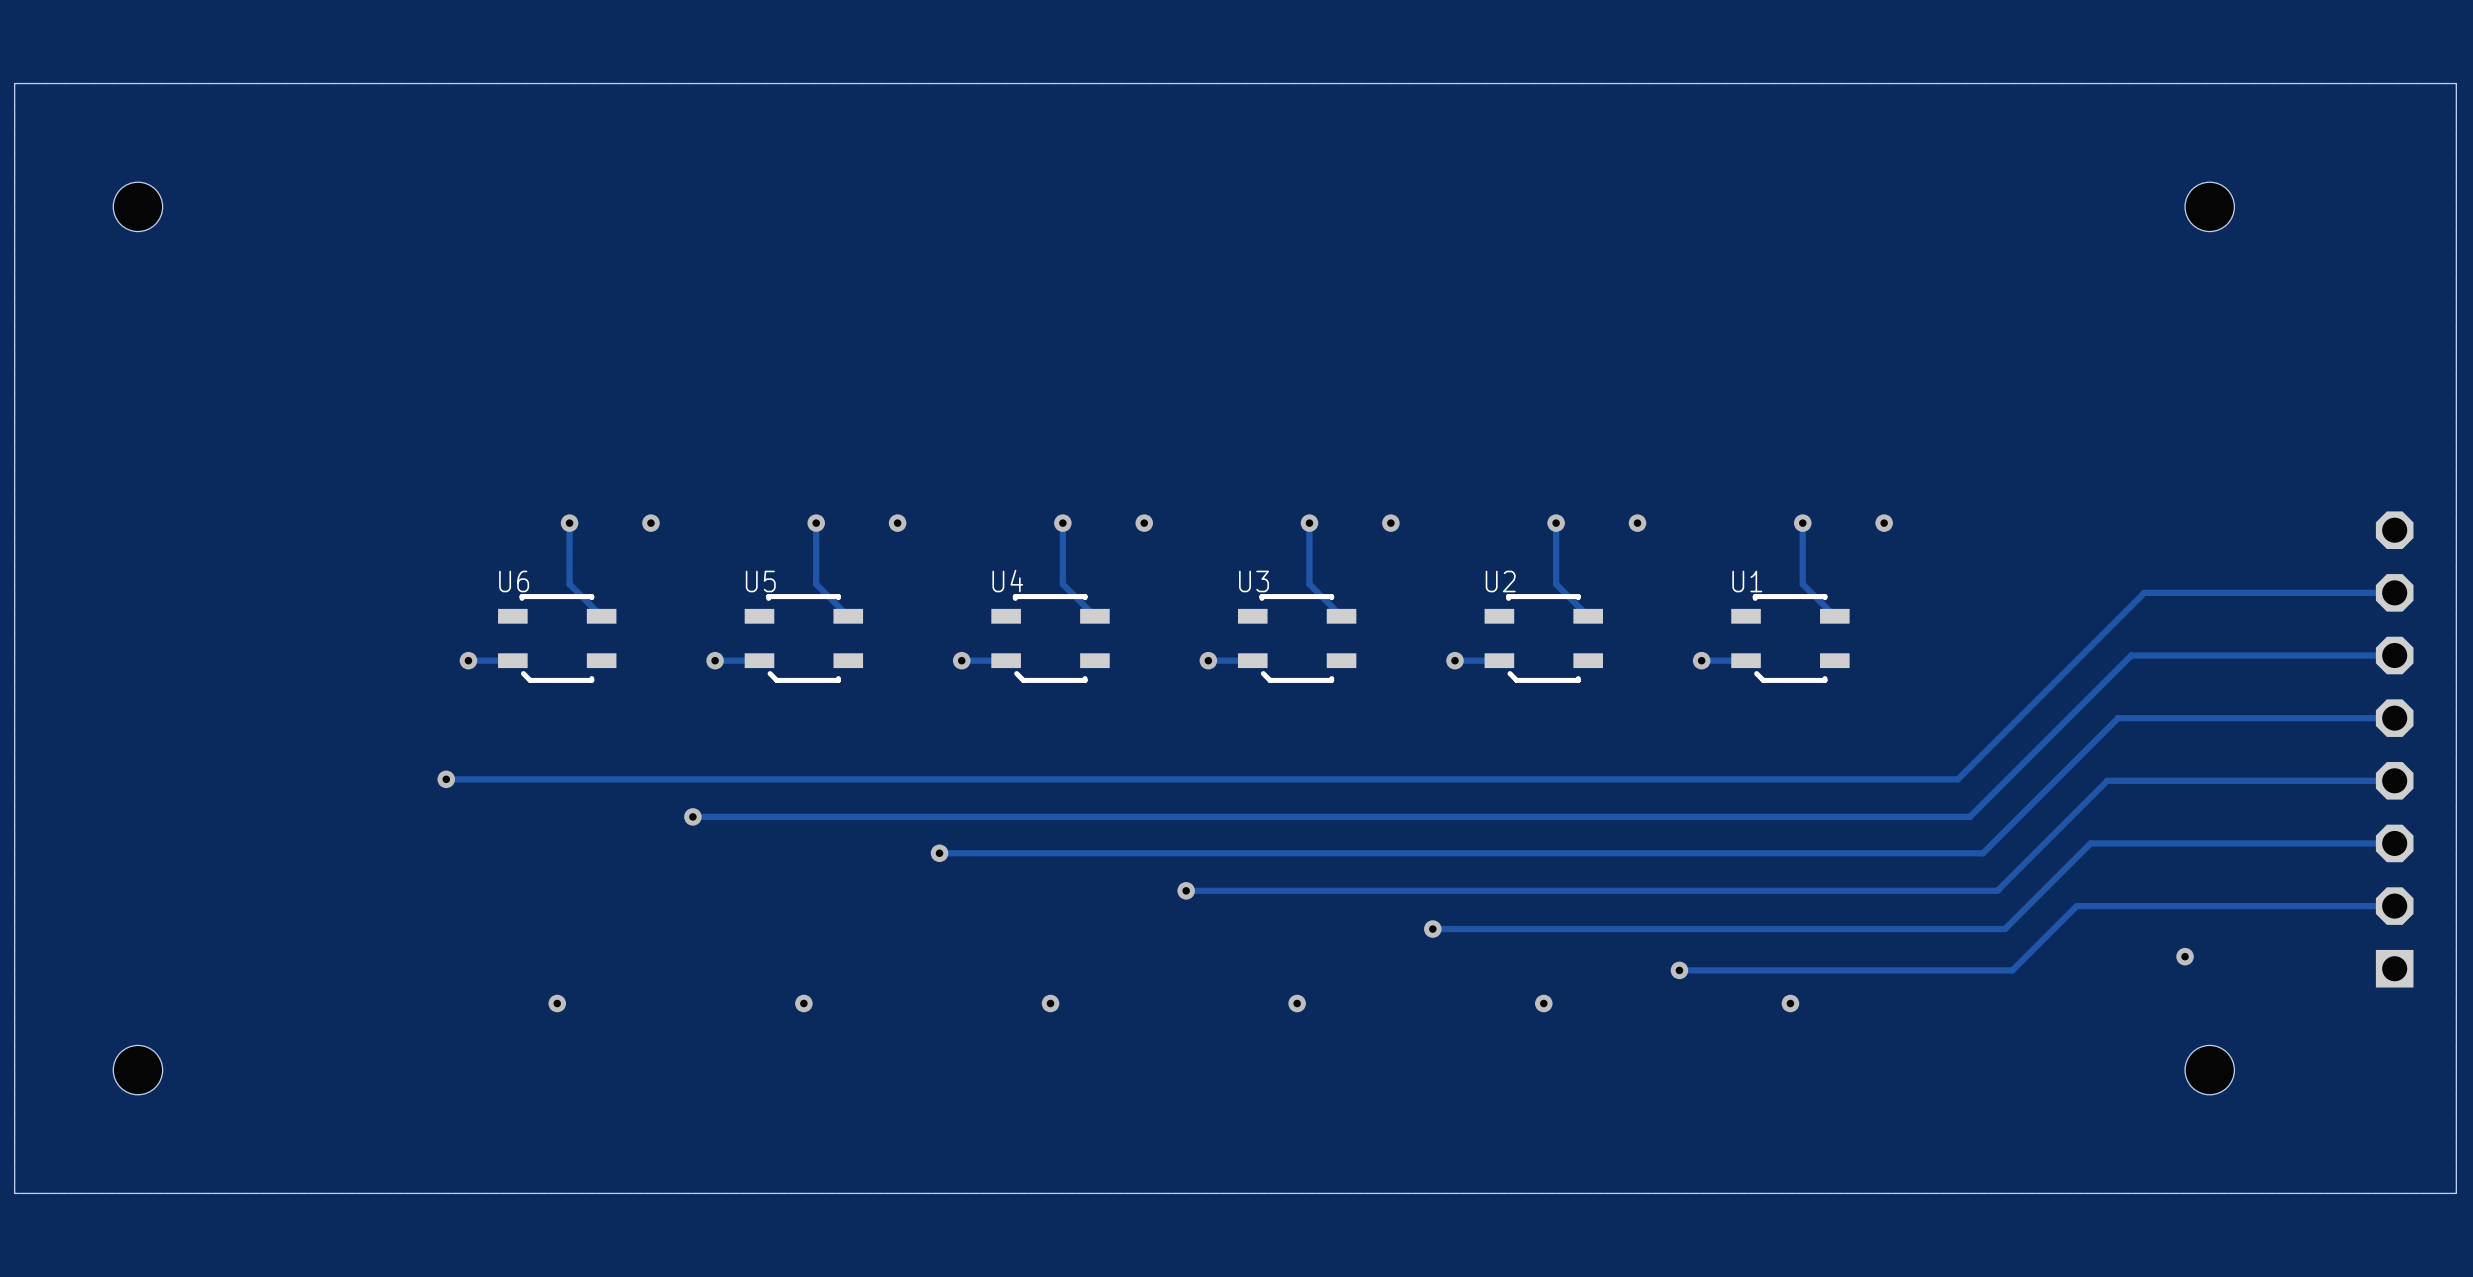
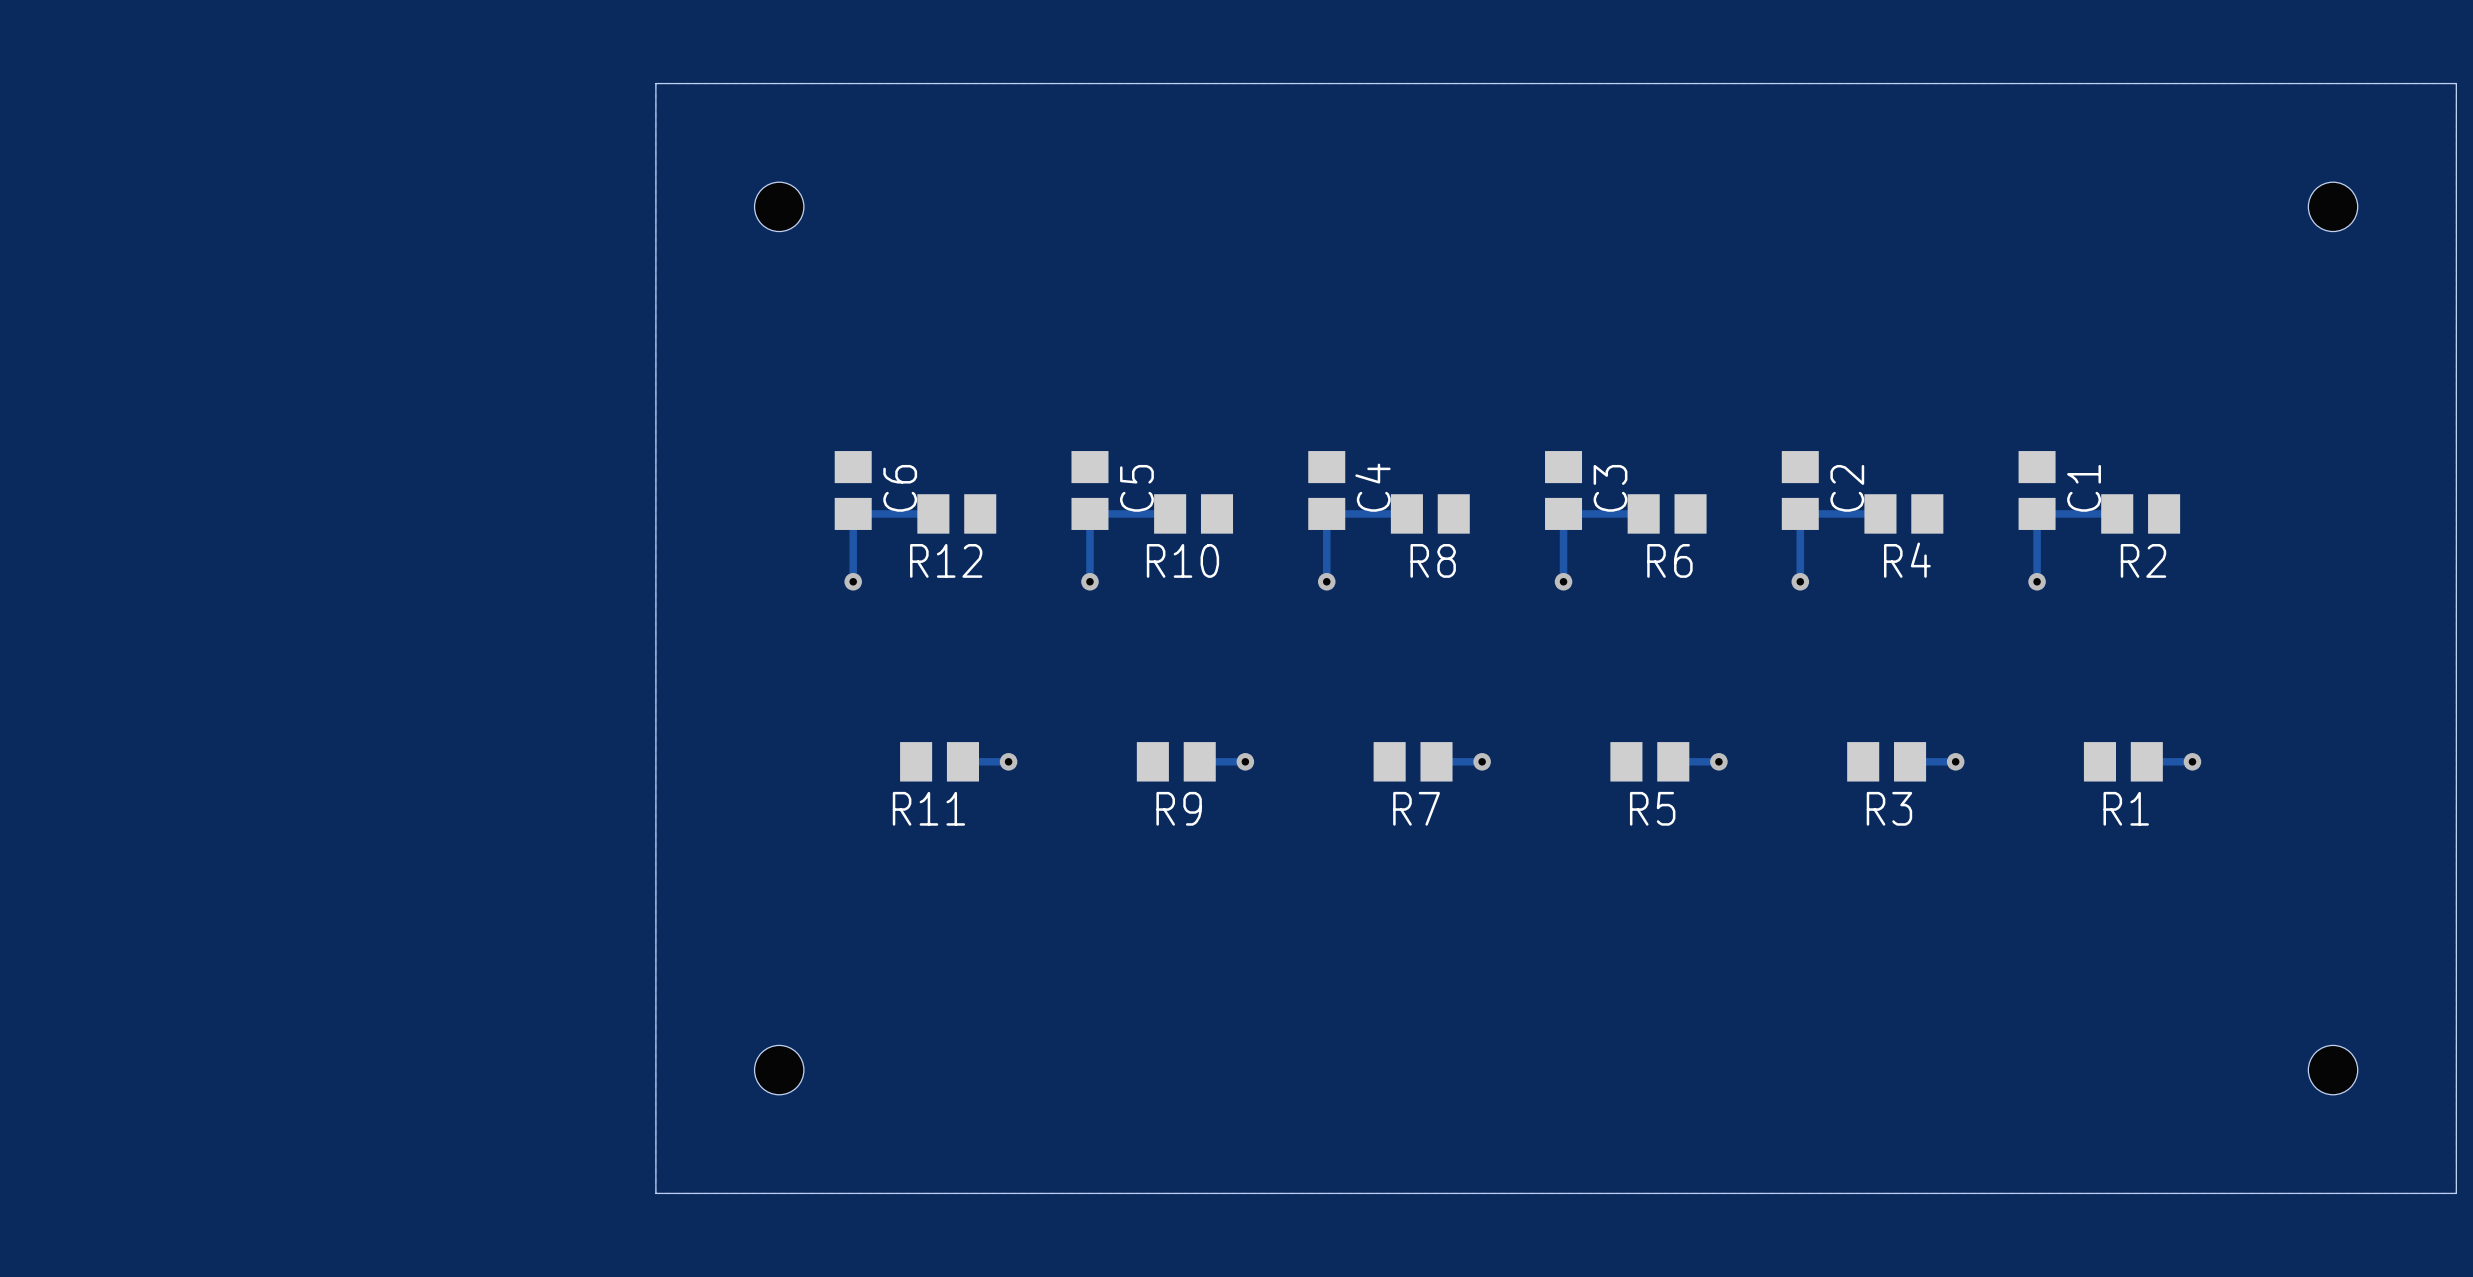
board edge: (655, 83) (14, 83) (14, 1193) (655, 1193) -> (655, 83) (655, 1193)
hole: (137, 206) -> none
hole: none -> (779, 206)
hole position: (2209, 206) -> (2333, 206)
C6: none -> (853, 490)
C5: none -> (1089, 490)
C4: none -> (1326, 490)
C3: none -> (1563, 490)
C2: none -> (1800, 490)
C1: none -> (2037, 490)
track: none -> (933, 513) (853, 513) (853, 581)
R12: none -> (956, 513)
track: none -> (1170, 513) (1089, 513) (1089, 581)
R10: none -> (1193, 513)
track: none -> (1406, 513) (1326, 513) (1326, 581)
R8: none -> (1430, 513)
track: none -> (1643, 513) (1563, 513) (1563, 581)
R6: none -> (1667, 513)
track: none -> (1880, 513) (1800, 513) (1800, 581)
R4: none -> (1903, 513)
track: none -> (2117, 513) (2037, 513) (2037, 581)
R2: none -> (2140, 513)
track: (569, 523) (569, 584) (601, 616) -> none
via: (569, 523) -> none
via: (650, 523) -> none
track: (816, 523) (816, 584) (848, 616) -> none
via: (816, 523) -> none
via: (897, 523) -> none
track: (1062, 523) (1062, 584) (1094, 616) -> none
via: (1062, 523) -> none
via: (1144, 523) -> none
track: (1309, 523) (1309, 584) (1341, 616) -> none
via: (1309, 523) -> none
via: (1390, 523) -> none
track: (1556, 523) (1556, 584) (1588, 616) -> none
via: (1556, 523) -> none
via: (1637, 523) -> none
track: (1802, 523) (1802, 584) (1834, 616) -> none
via: (1802, 523) -> none
via: (1884, 523) -> none
via: none -> (853, 581)
via: none -> (1089, 581)
via: none -> (1326, 581)
via: none -> (1563, 581)
via: none -> (1800, 581)
via: none -> (2037, 581)
track: (2394, 592) (2144, 592) (1957, 779) (446, 779) -> none
U6: (557, 638) -> none
U5: (803, 638) -> none
U4: (1050, 638) -> none
U3: (1297, 638) -> none
U2: (1543, 638) -> none
U1: (1790, 638) -> none
track: (2394, 655) (2131, 655) (1969, 816) (692, 816) -> none
via: (468, 660) -> none
track: (512, 660) (468, 660) -> none
via: (715, 660) -> none
track: (759, 660) (715, 660) -> none
via: (961, 660) -> none
track: (1006, 660) (961, 660) -> none
via: (1208, 660) -> none
track: (1252, 660) (1208, 660) -> none
via: (1455, 660) -> none
track: (1499, 660) (1455, 660) -> none
via: (1701, 660) -> none
track: (1746, 660) (1701, 660) -> none
track: (2394, 718) (2118, 718) (1982, 853) (939, 853) -> none
part: (2394, 749) -> none
R11: none -> (939, 761)
track: none -> (1008, 761) (962, 761)
via: none -> (1008, 761)
R9: none -> (1176, 761)
track: none -> (1245, 761) (1199, 761)
via: none -> (1245, 761)
R7: none -> (1413, 761)
track: none -> (1482, 761) (1436, 761)
via: none -> (1482, 761)
R5: none -> (1649, 761)
track: none -> (1718, 761) (1673, 761)
via: none -> (1718, 761)
R3: none -> (1886, 761)
track: none -> (1955, 761) (1910, 761)
via: none -> (1955, 761)
R1: none -> (2123, 761)
track: none -> (2192, 761) (2146, 761)
via: none -> (2192, 761)
via: (446, 779) -> none
track: (2394, 780) (2107, 780) (1997, 890) (1186, 890) -> none
via: (692, 816) -> none
track: (2394, 843) (2090, 843) (2004, 929) (1432, 929) -> none
via: (939, 853) -> none
via: (1186, 890) -> none
track: (2394, 906) (2076, 906) (2012, 970) (1679, 970) -> none
via: (1432, 929) -> none
via: (2185, 956) -> none
via: (1679, 970) -> none
via: (557, 1003) -> none
via: (803, 1003) -> none
via: (1050, 1003) -> none
via: (1297, 1003) -> none
via: (1543, 1003) -> none
via: (1790, 1003) -> none
hole: (137, 1070) -> none
hole: none -> (779, 1070)
hole position: (2209, 1070) -> (2333, 1070)

